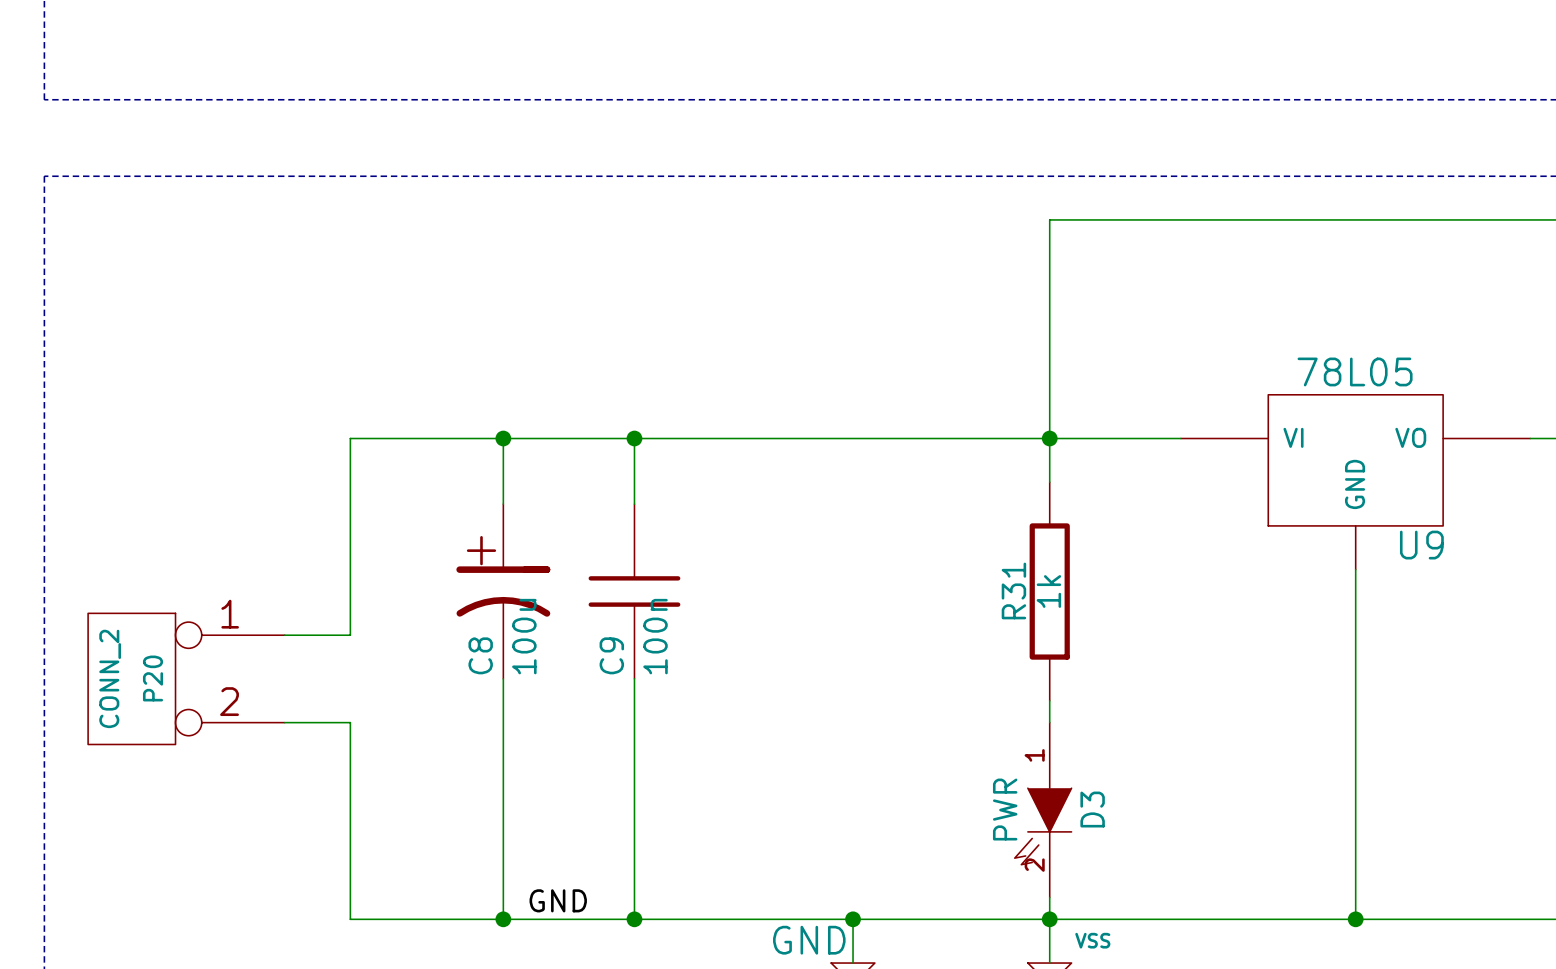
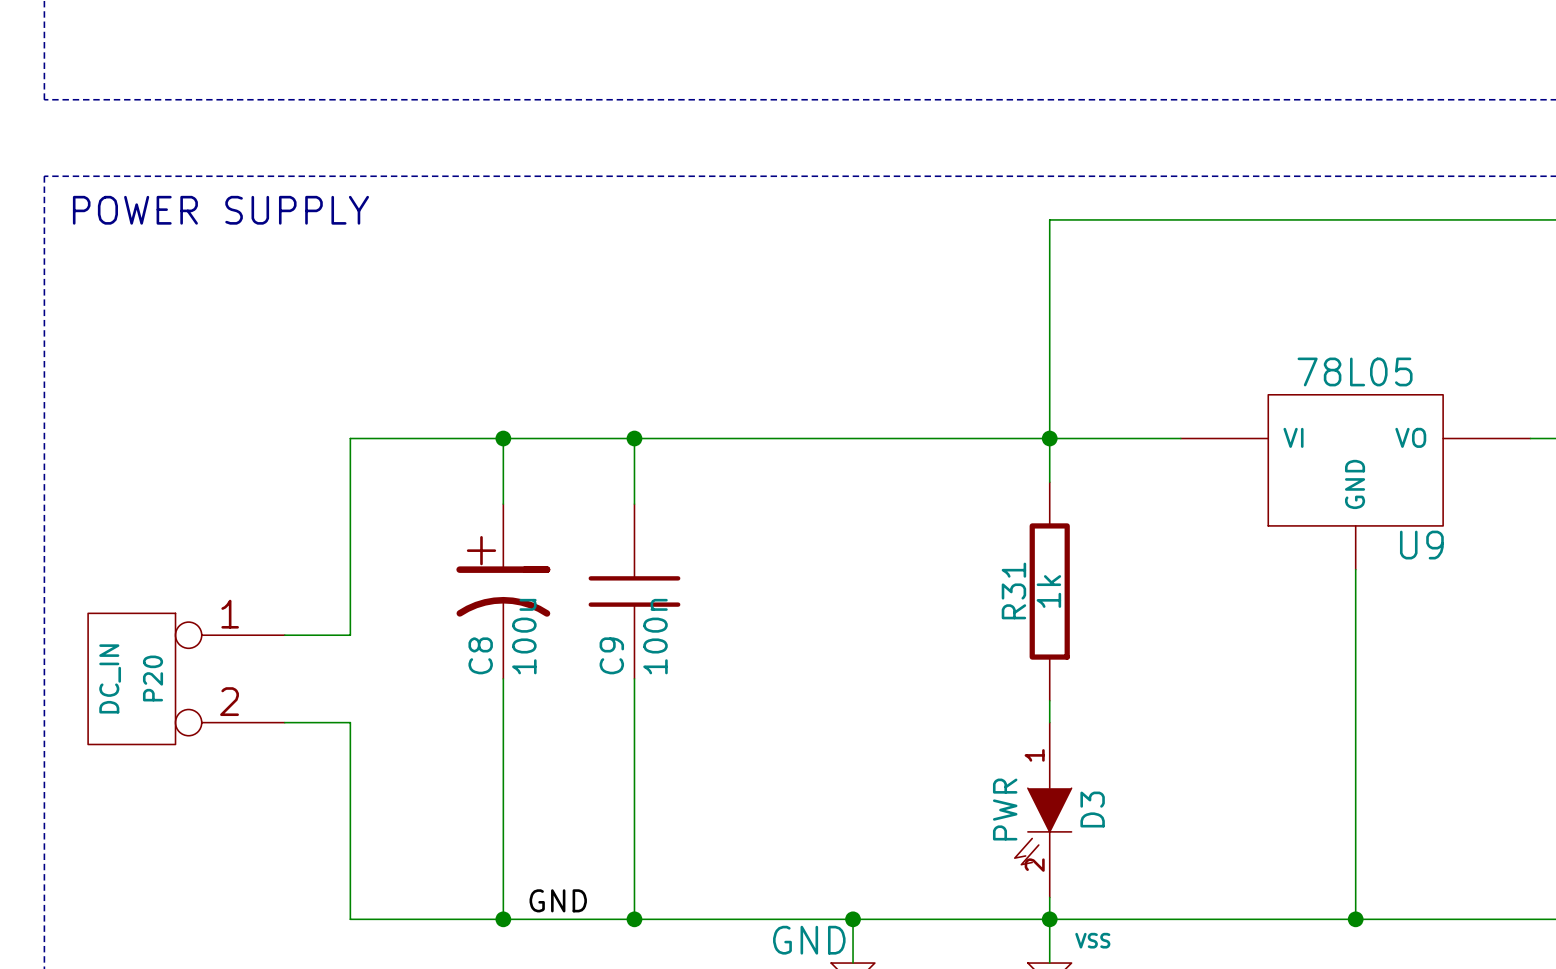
text: none -> POWER SUPPLY (220, 210)
P20 value: CONN_2 (110, 678) -> DC_IN (110, 678)

